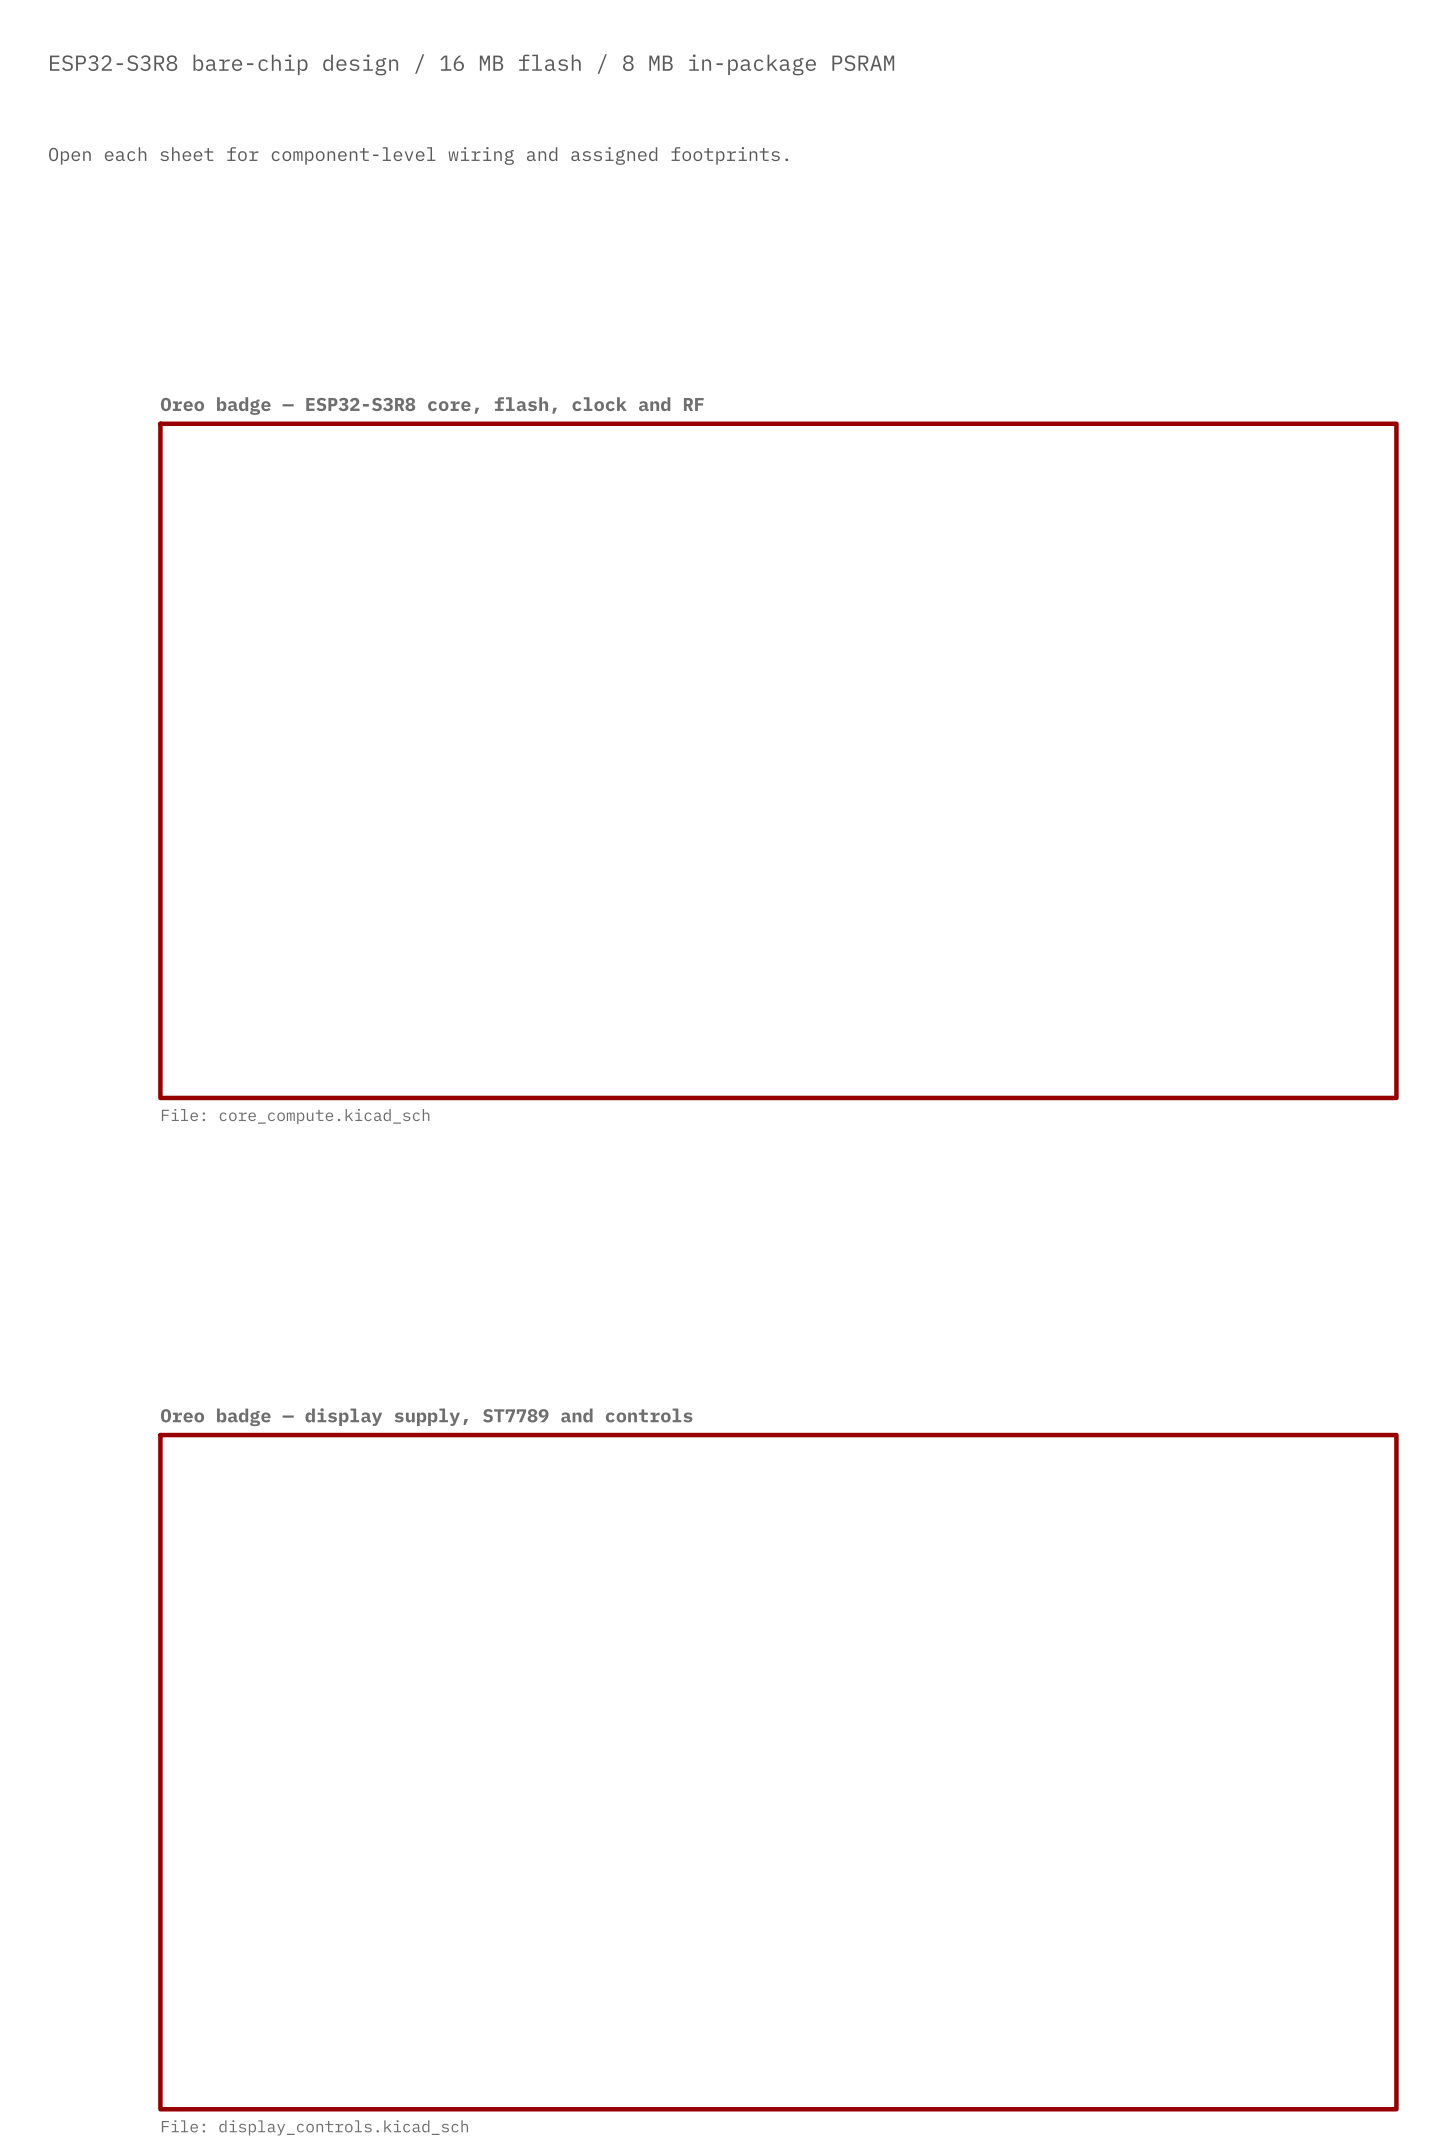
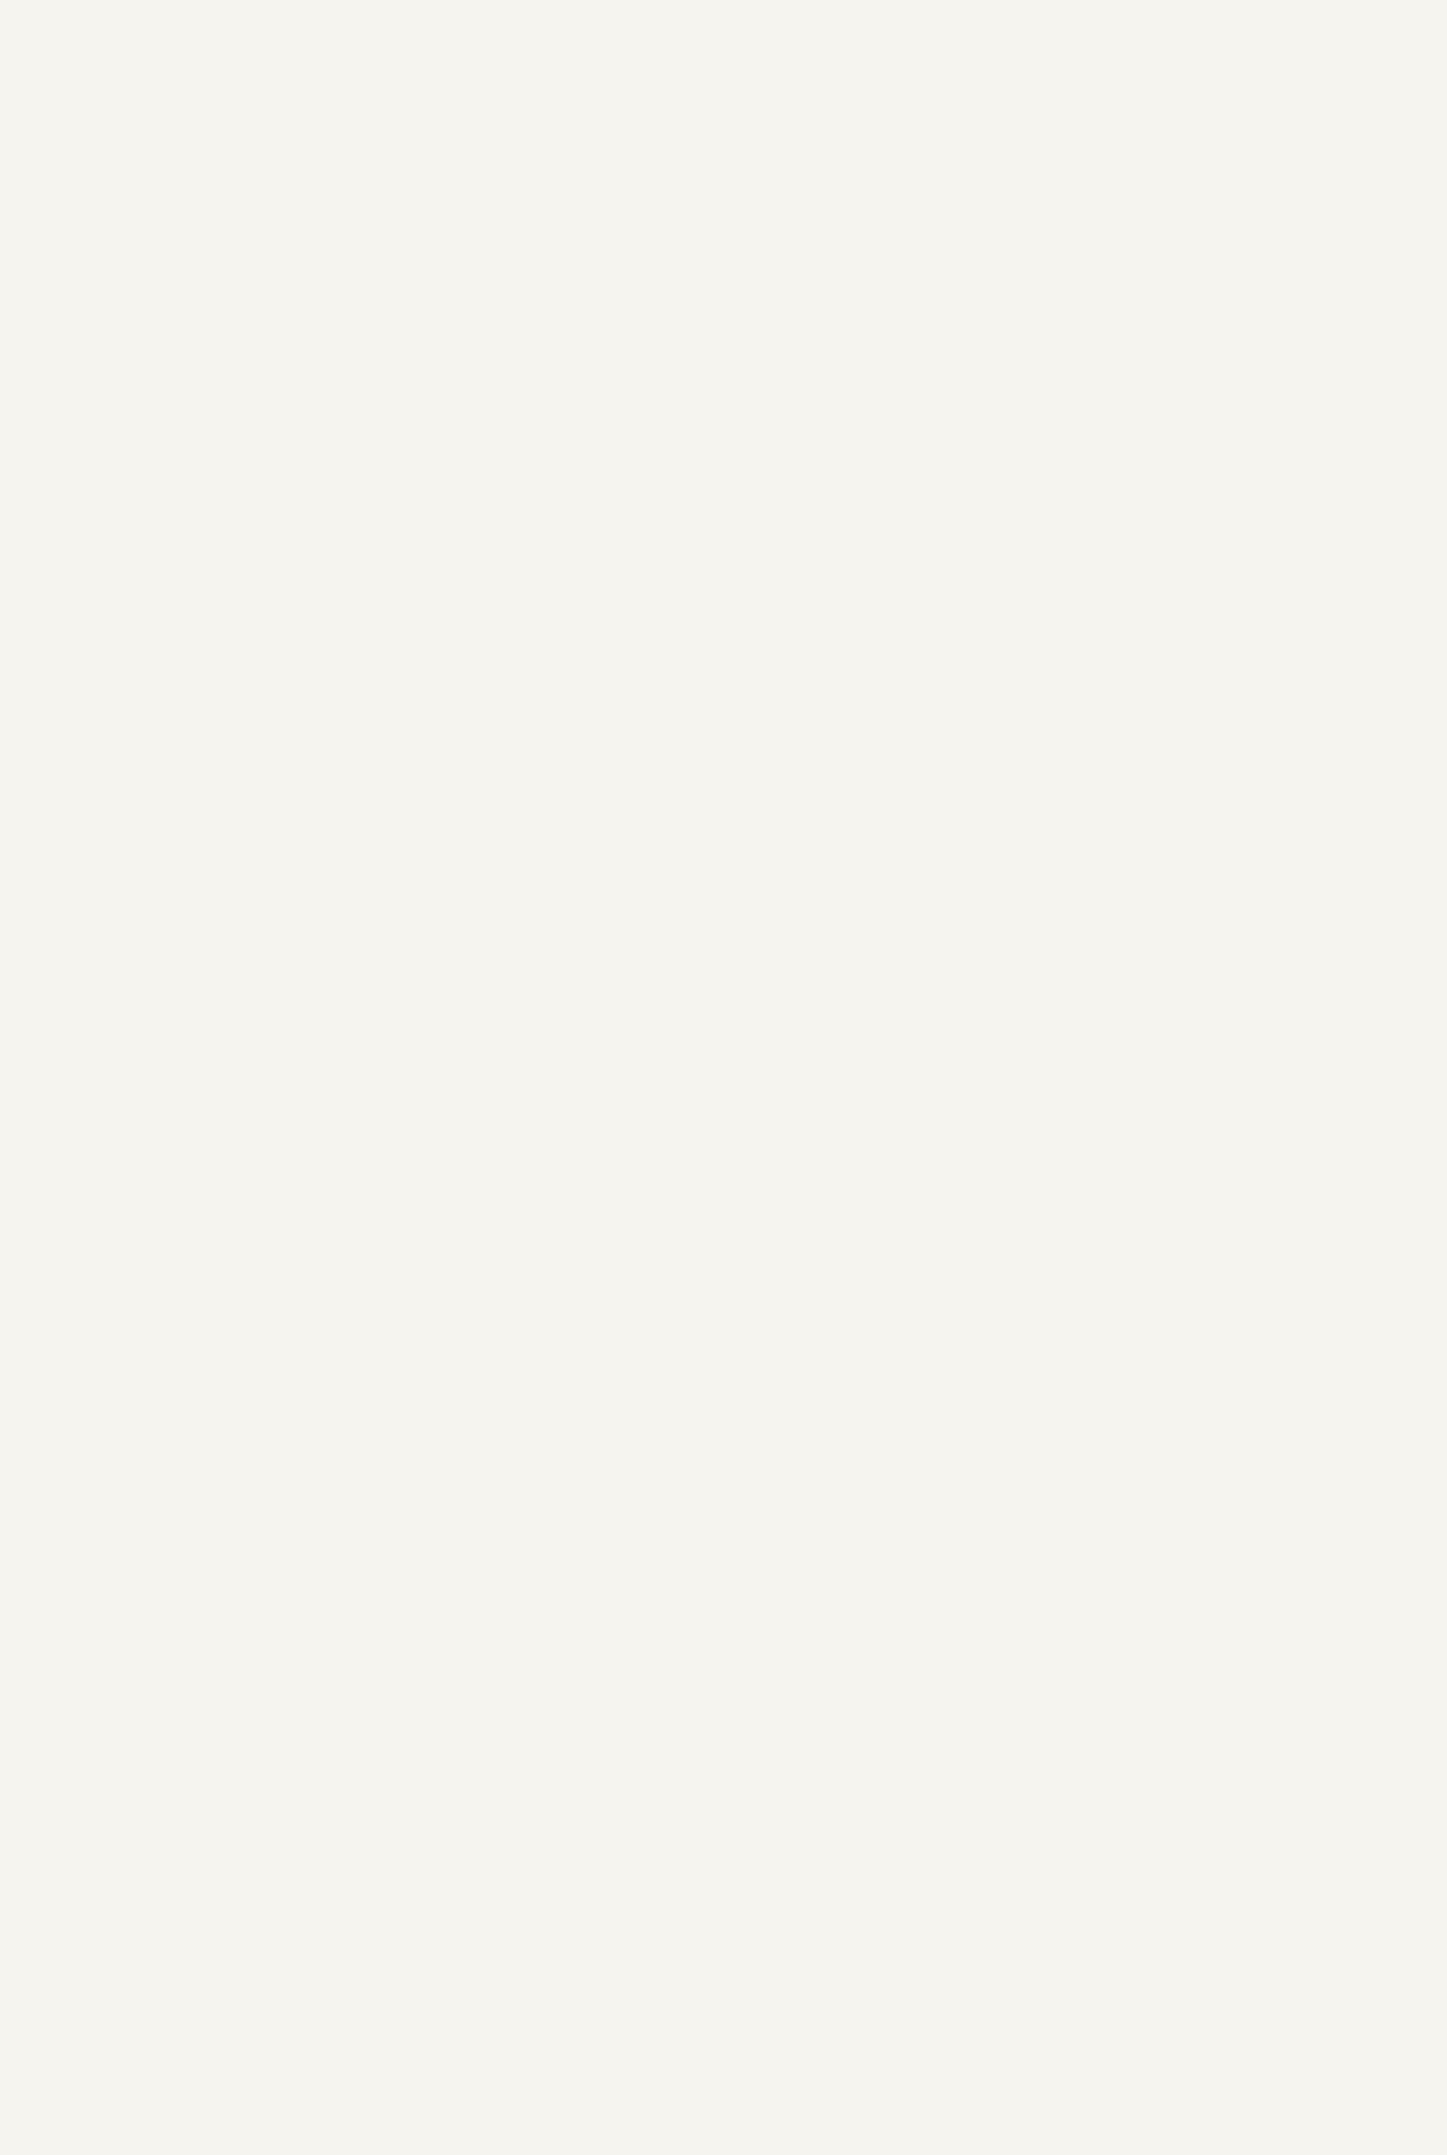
text: ESP32-S3R8 bare-chip design / 16 MB flash / 8 MB in-package PSRAM (472, 64) -> none
text: Open each sheet for component-level wiring and assigned footprints. (418, 155) -> none
sheet Oreo badge — ESP32-S3R8 core, flash, clock and RF: File: core_compute.kicad_sch (778, 760) -> none
sheet Oreo badge — display supply, ST7789 and controls: File: display_controls.kicad_sch (778, 1772) -> none

